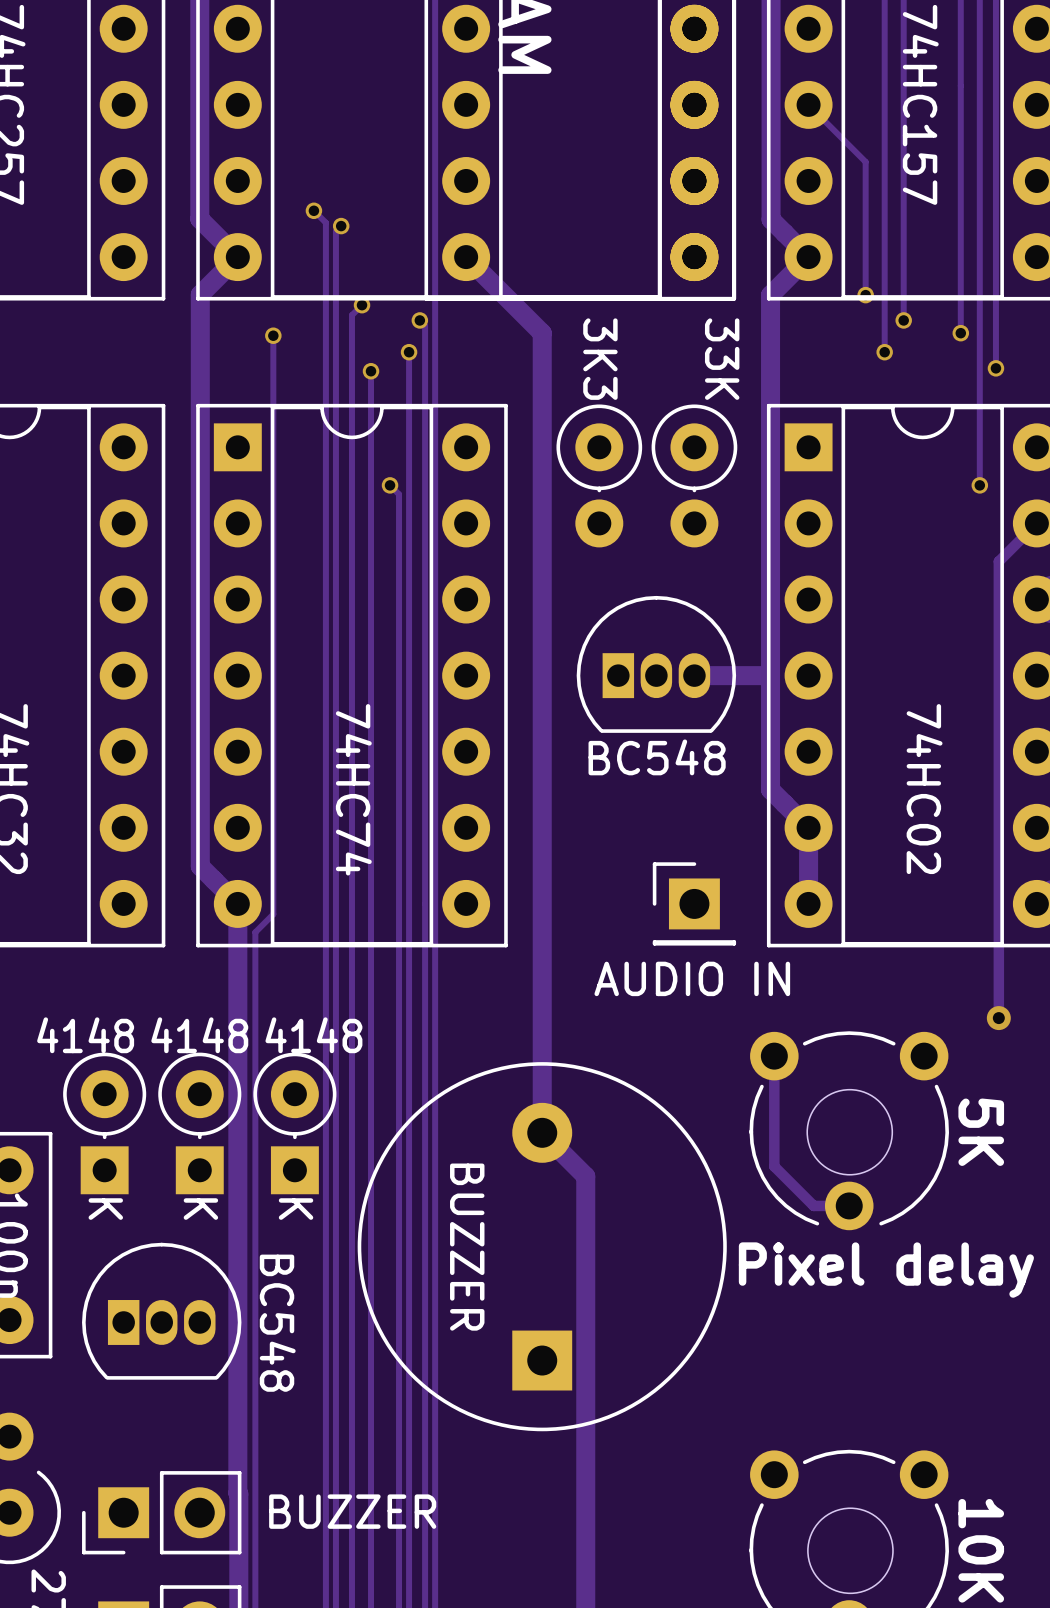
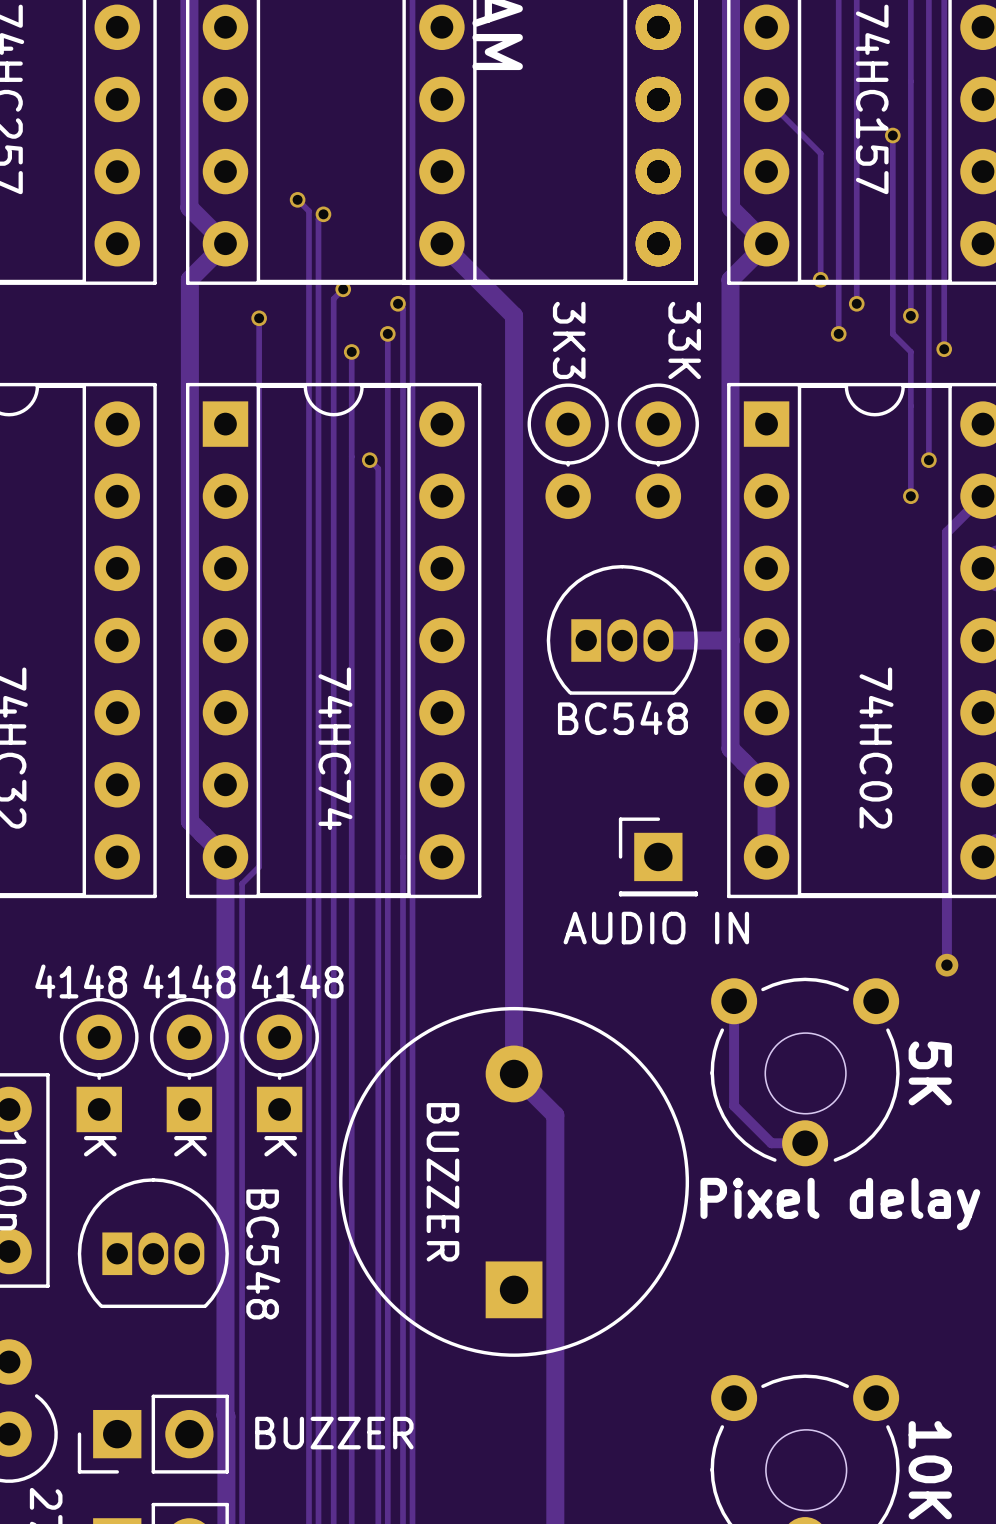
track: none -> (892, 135) (892, 333) (910, 351) (910, 496)
via: none -> (892, 135)
via: none -> (910, 496)

